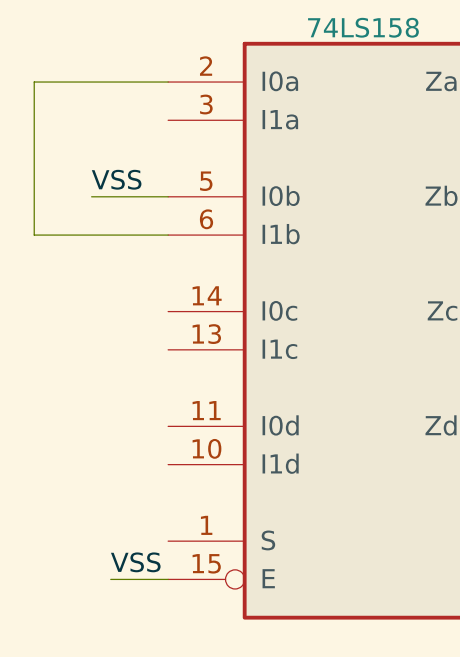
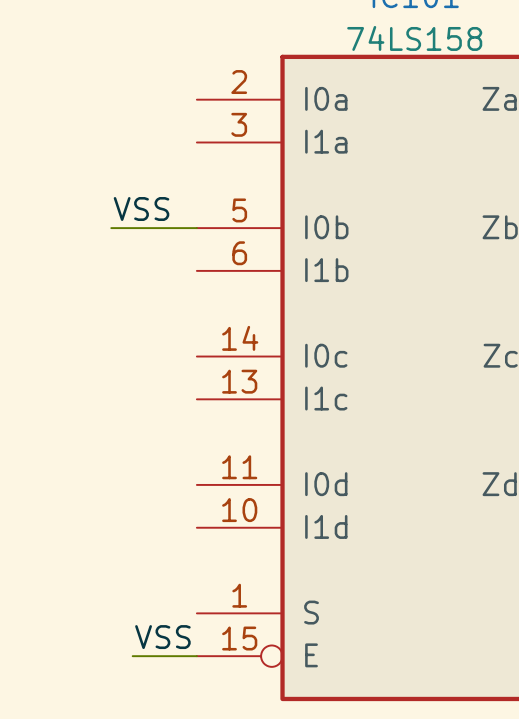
wire: (168, 82) (34, 82) (34, 235) (168, 235) -> none

